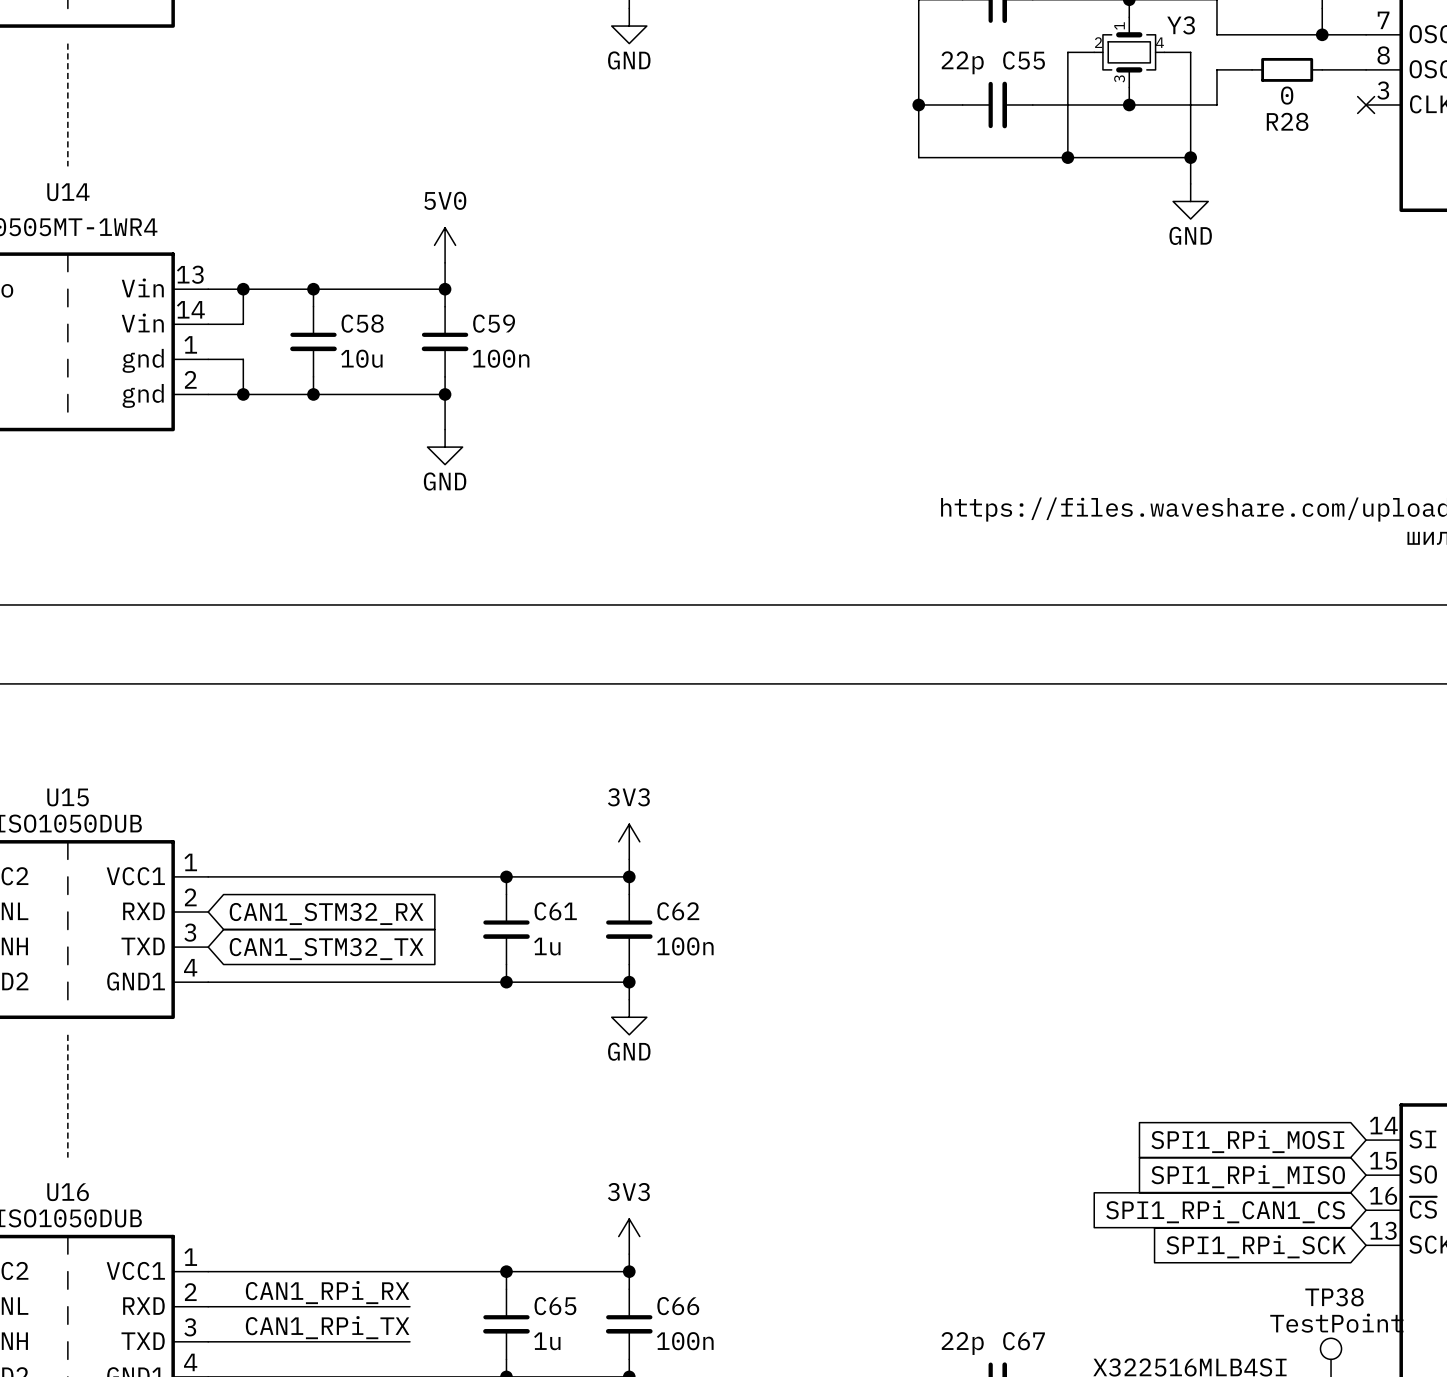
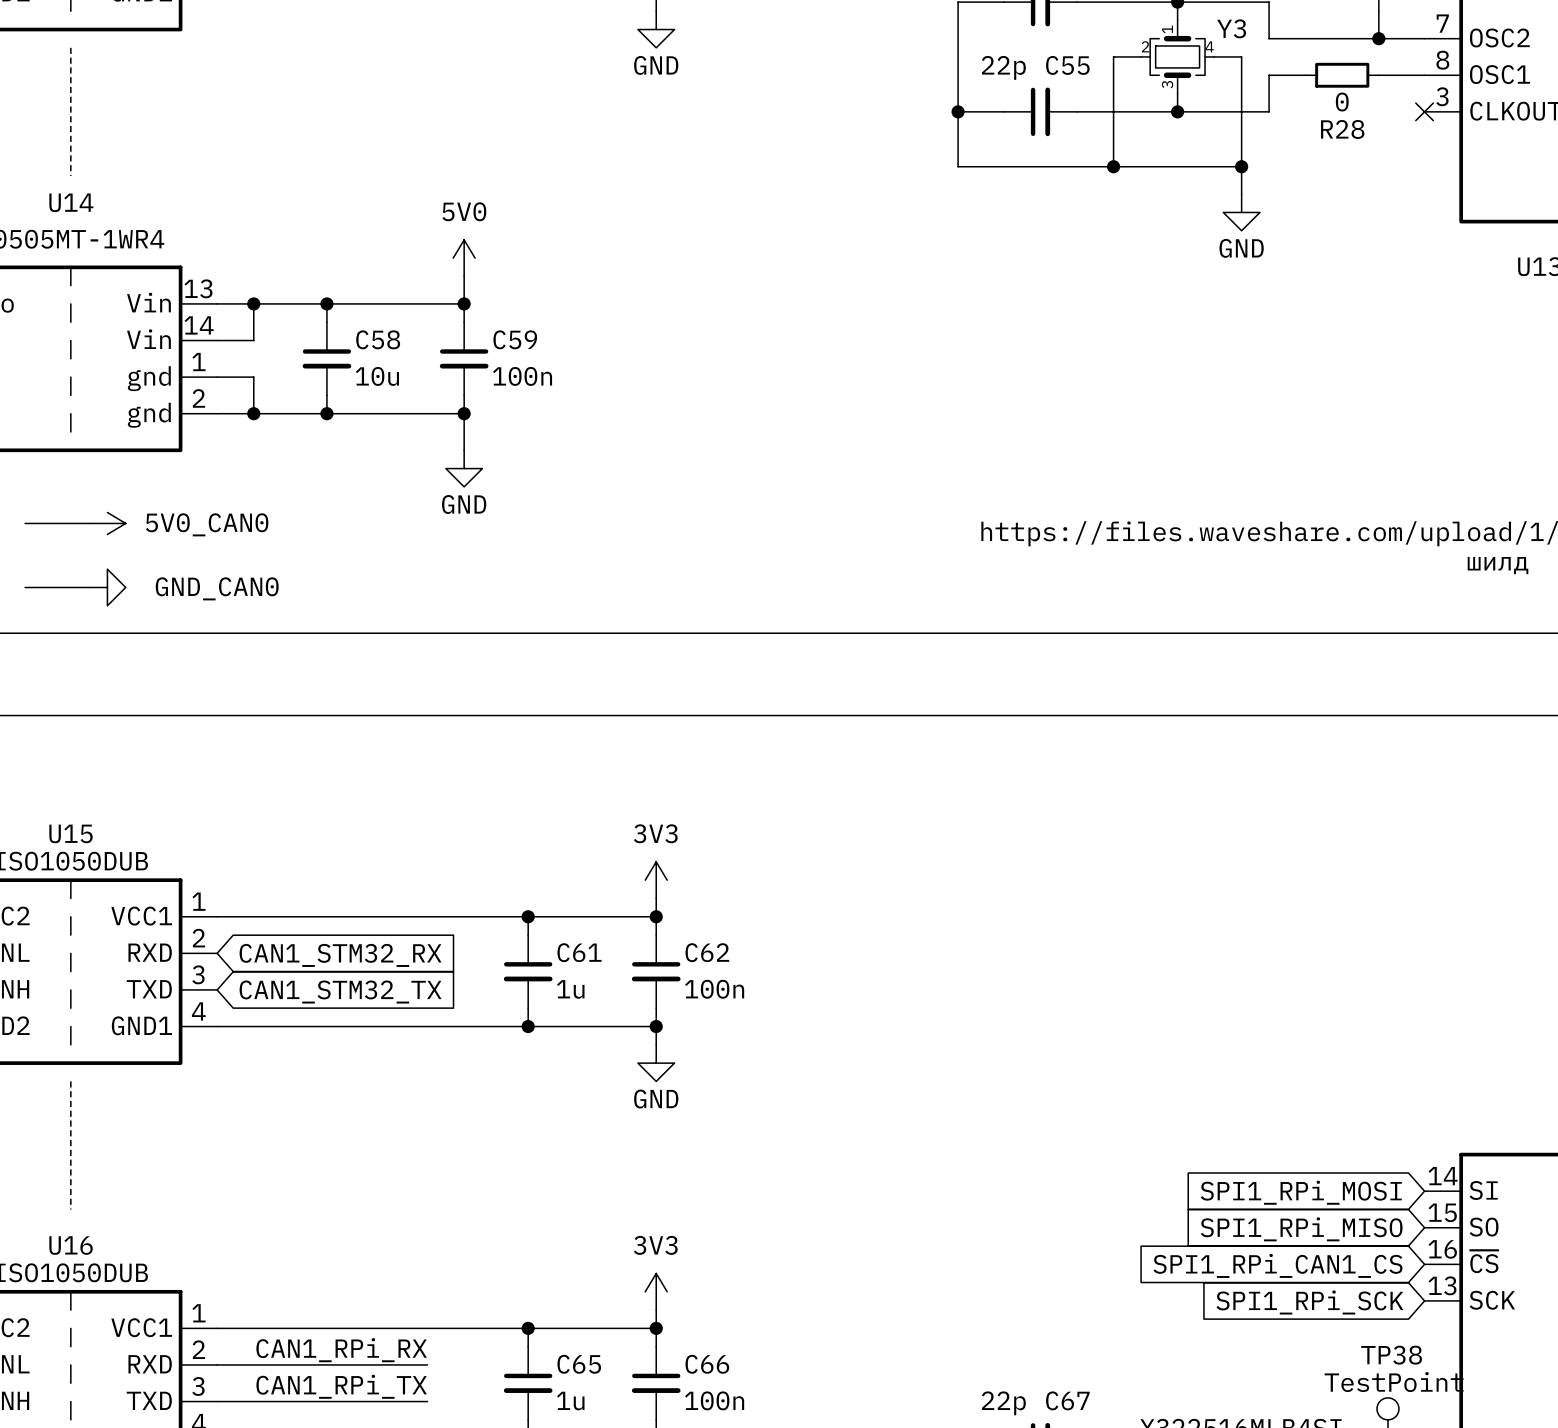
wire: none -> (25, 523) (89, 523)
power symbol: none -> 5V0_CAN0 (107, 523)
wire: none -> (25, 587) (89, 587)
power symbol: none -> GND_CAN0 (107, 587)

